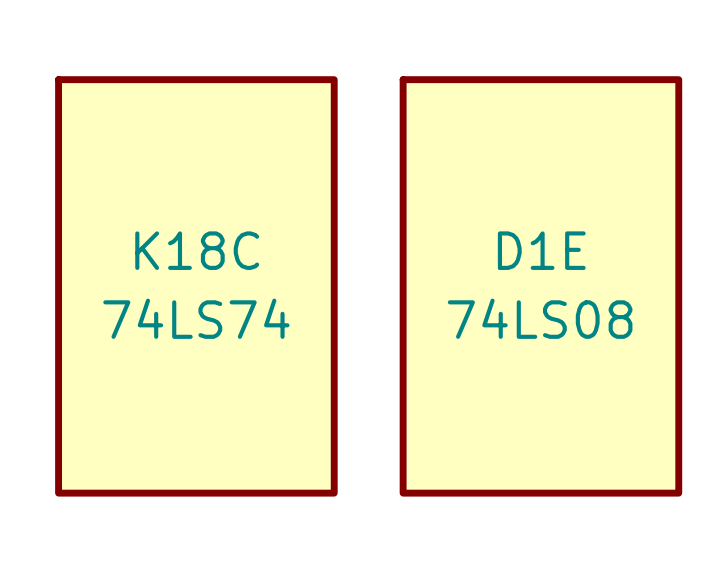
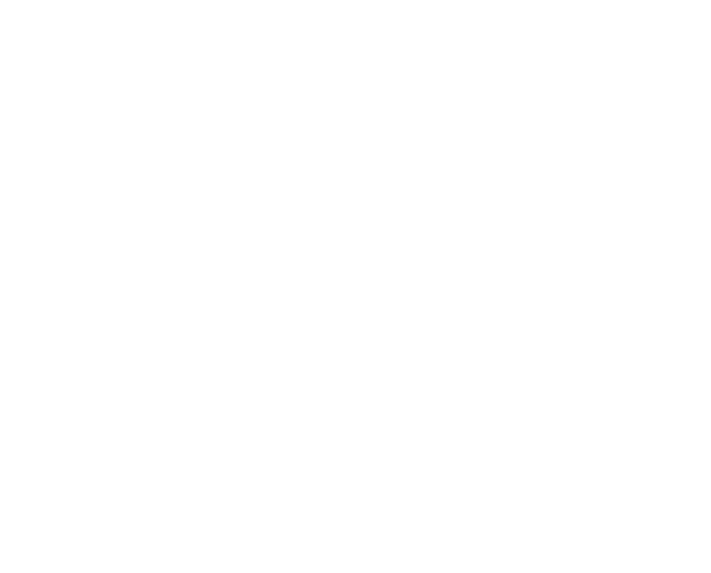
K18C: 74LS74 (196, 286) -> none
D1E: 74LS08 (540, 286) -> none

